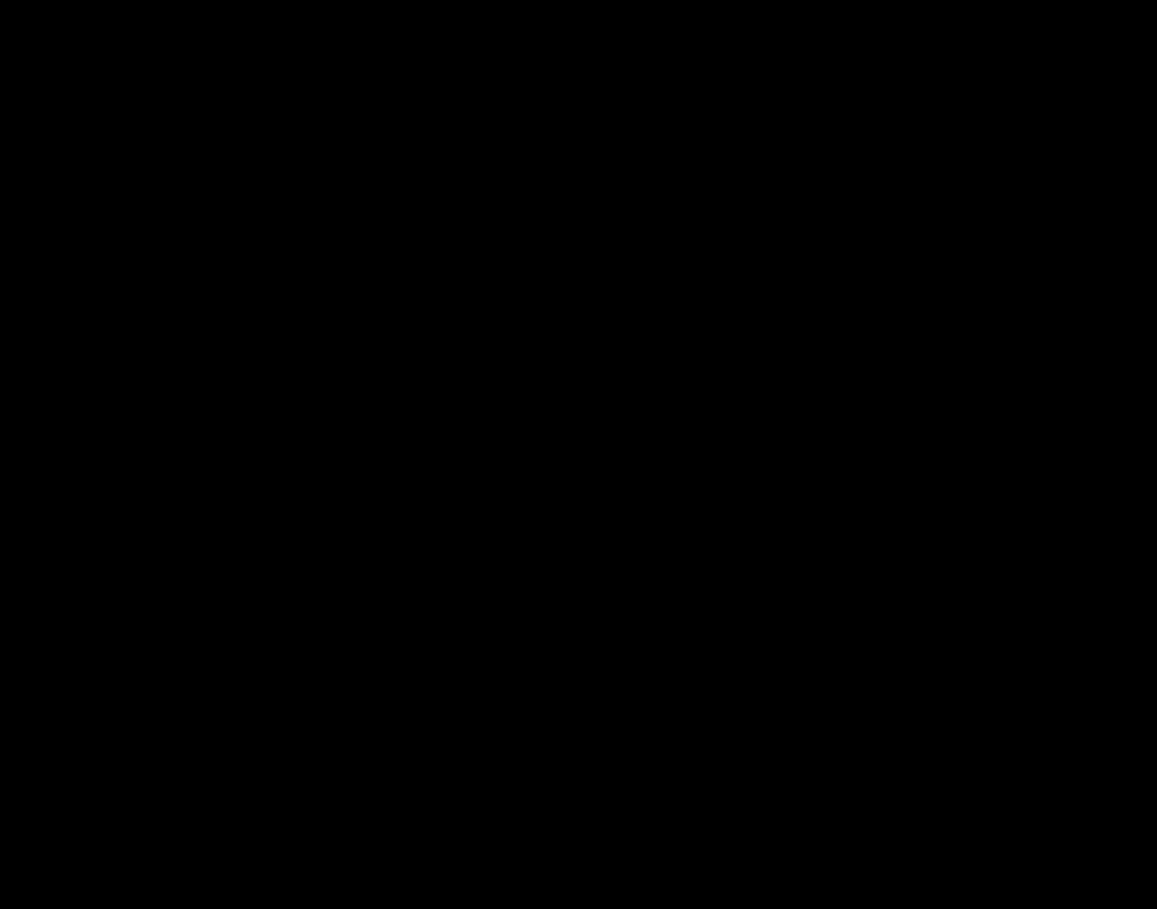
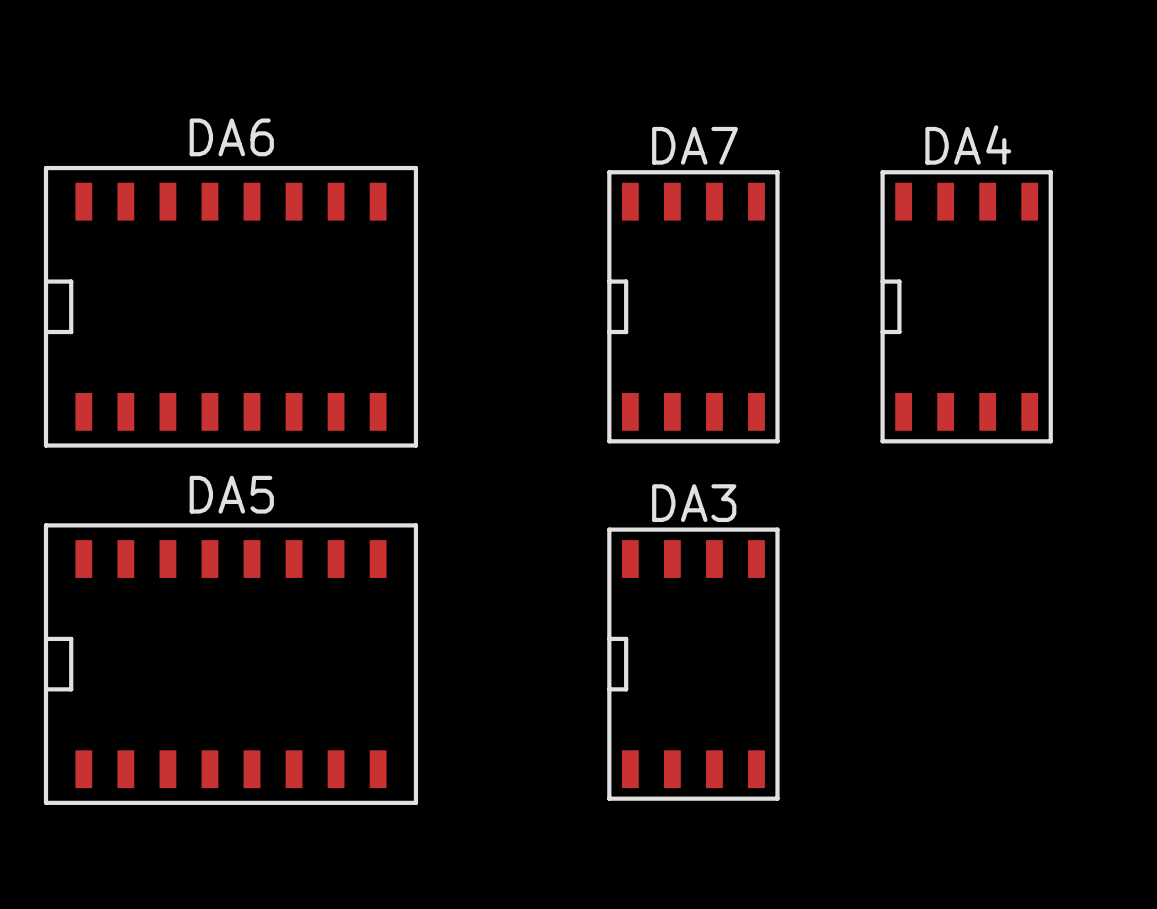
DA6: none -> (230, 306)
DA7: none -> (693, 306)
DA4: none -> (966, 306)
DA5: none -> (230, 664)
DA3: none -> (693, 664)

